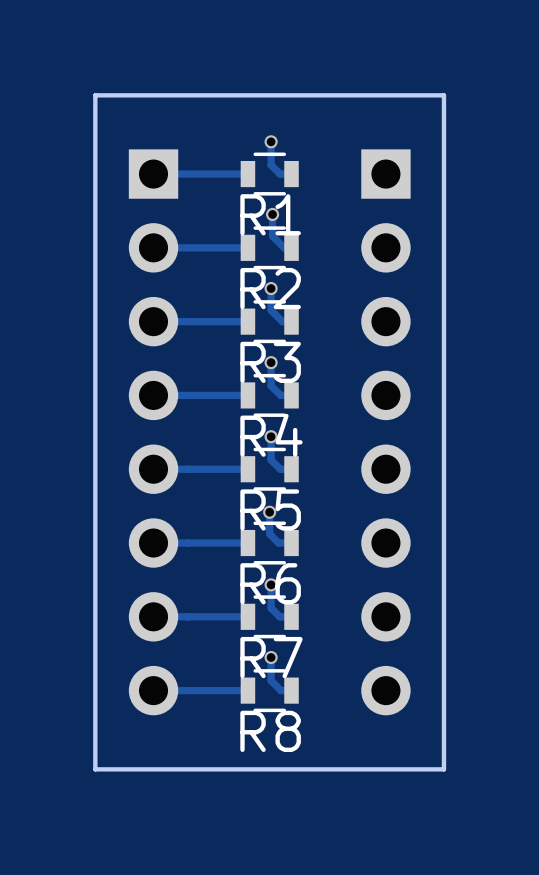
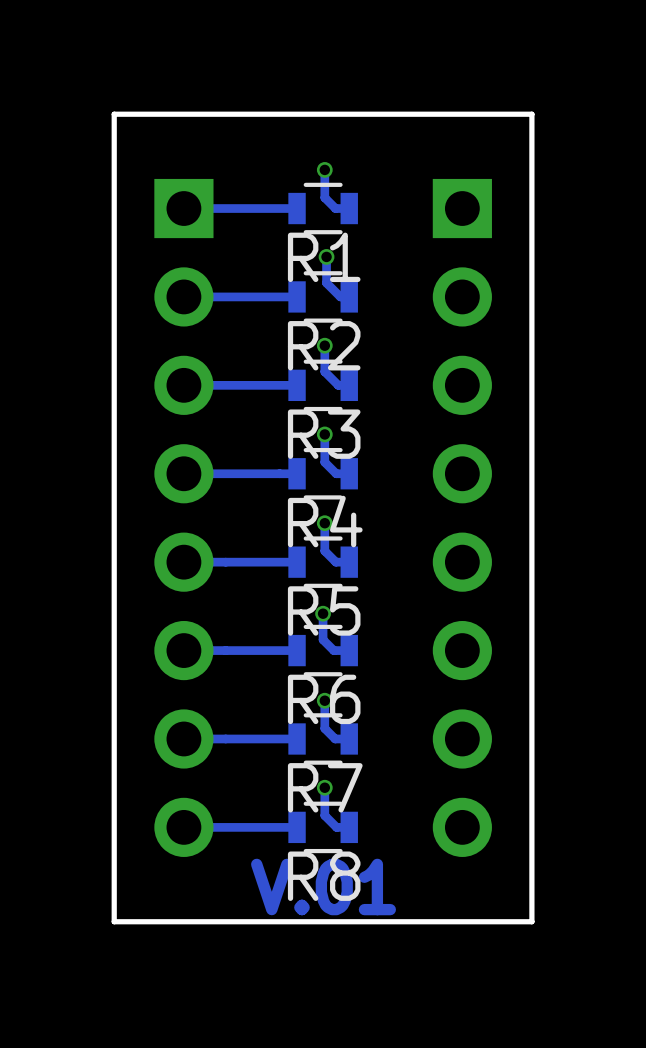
text: none -> V.01 (323, 886)

